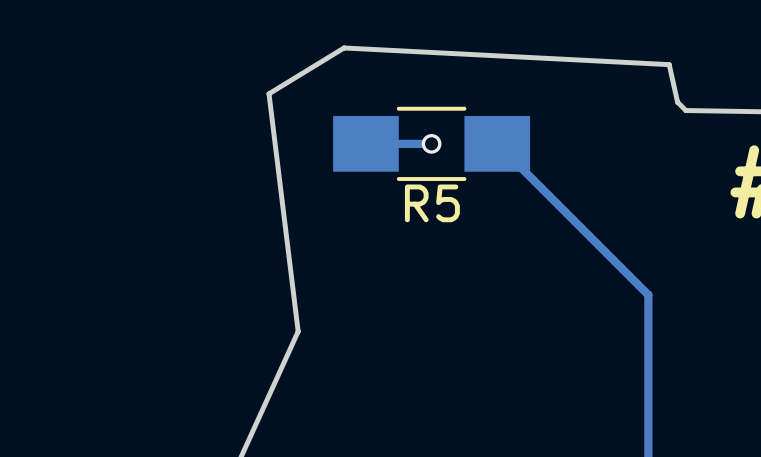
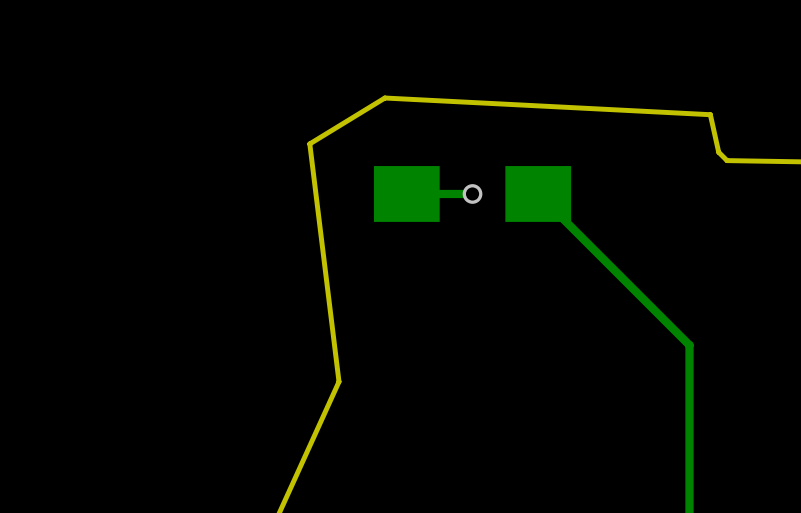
R5: (431, 143) -> none

